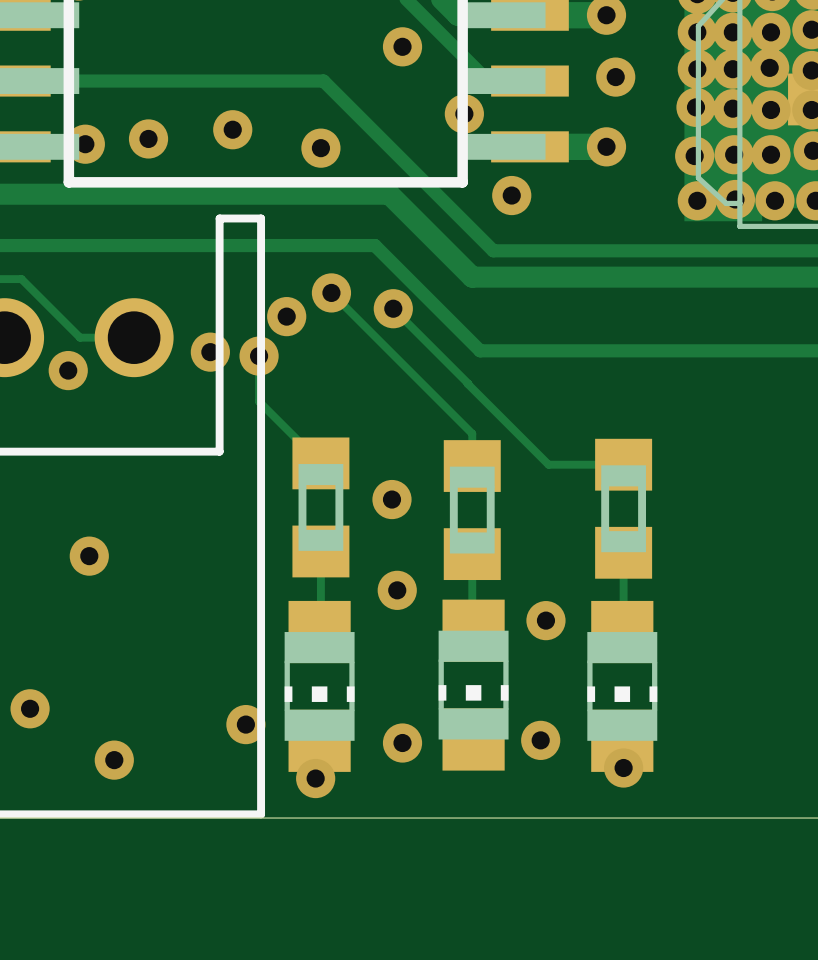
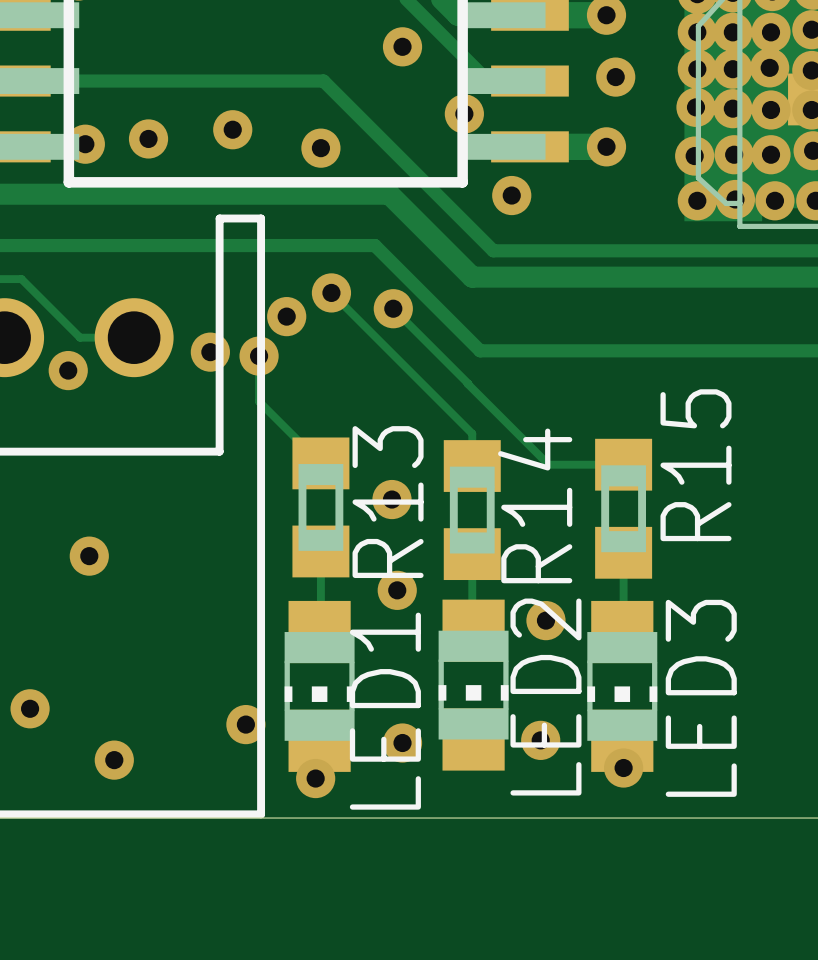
R15 name: none -> R15 (695, 465)
R13 name: none -> R13 (388, 502)
R14 name: none -> R14 (535, 505)
LED2 name: none -> LED2 (545, 697)
LED3 name: none -> LED3 (701, 698)
LED1 name: none -> LED1 (385, 711)

